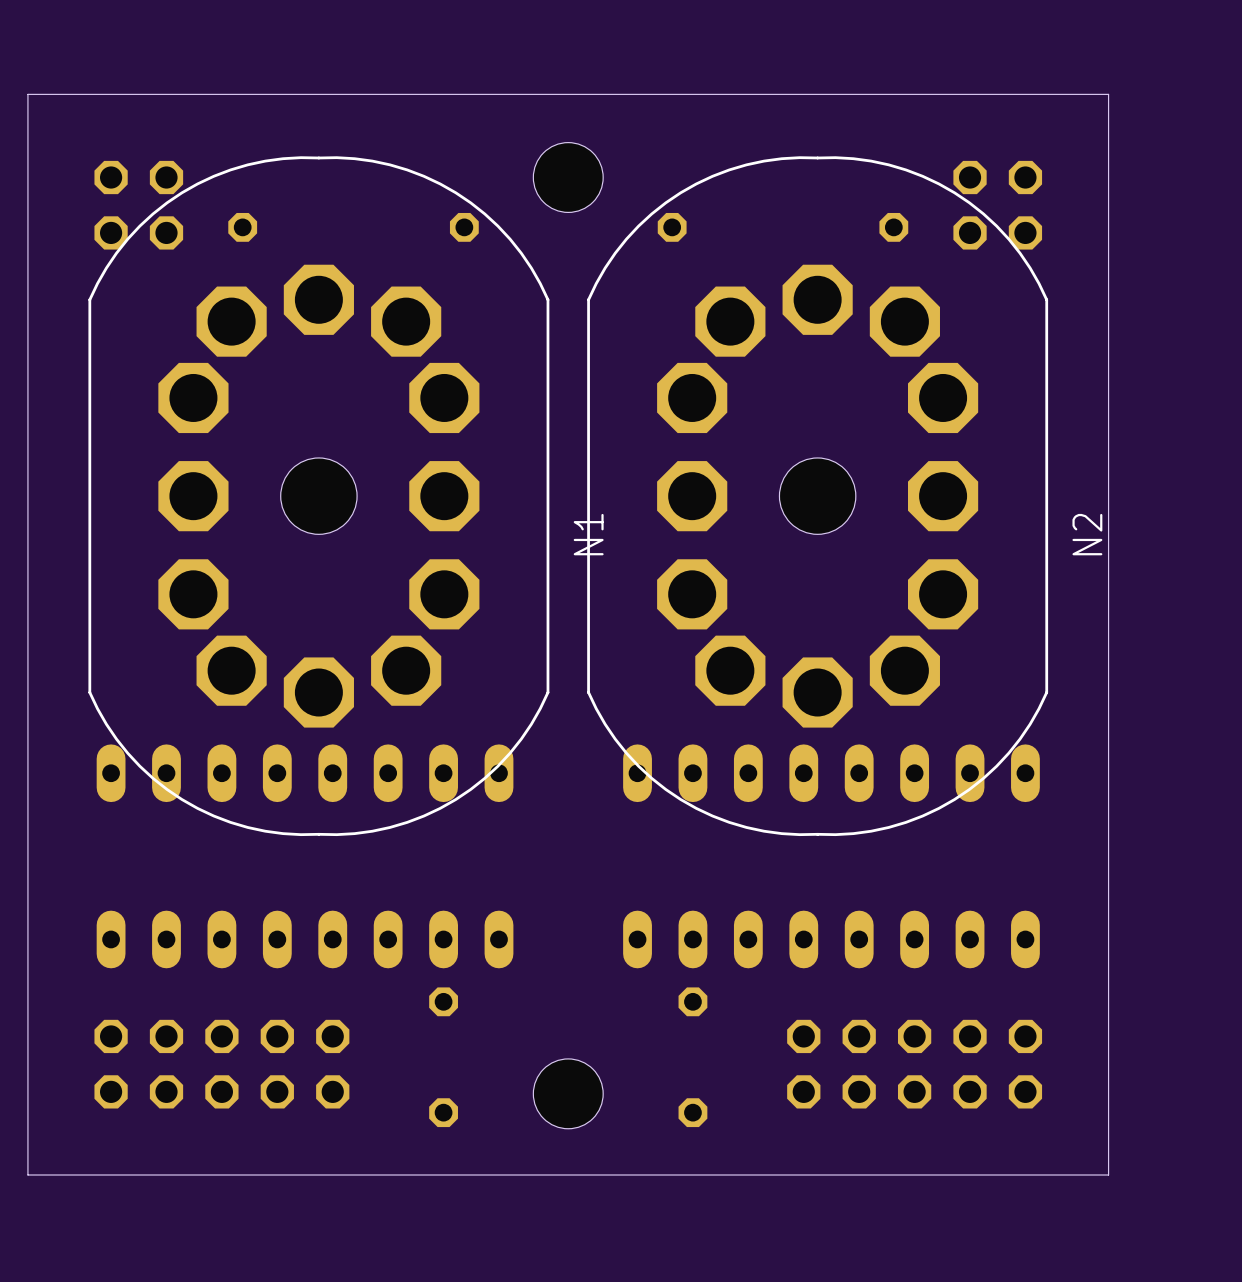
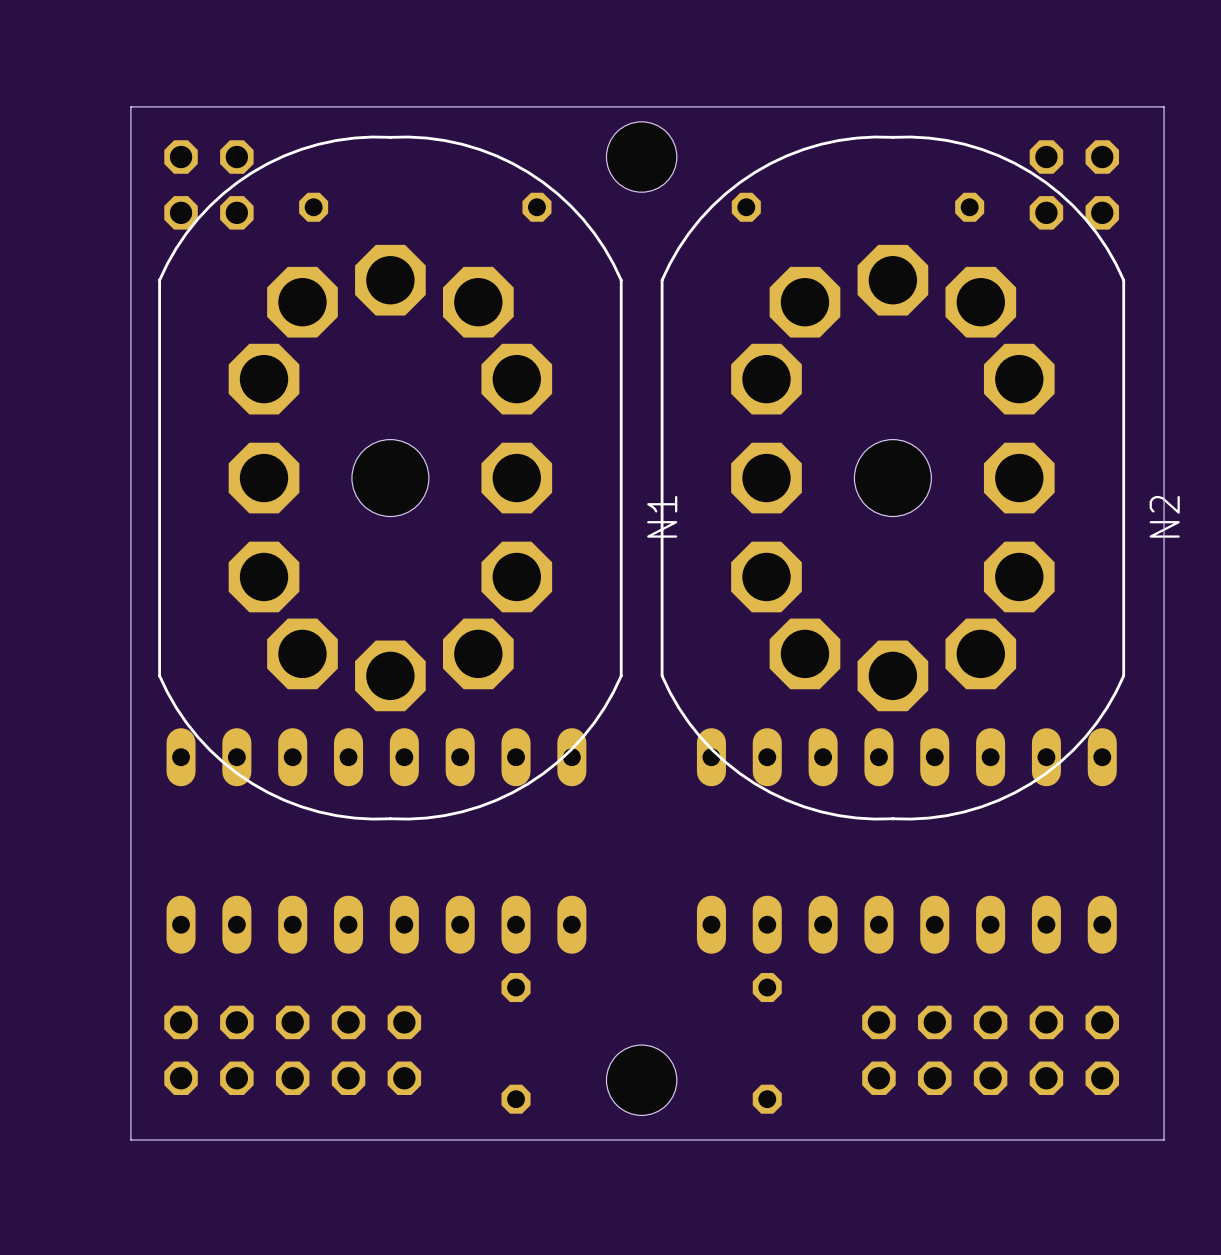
board edge: (1108, 94) (27, 94) (27, 1175) (1108, 1175) (1108, 94) -> (1164, 106) (1164, 1140) (130, 1140) (130, 106) (1164, 106)

